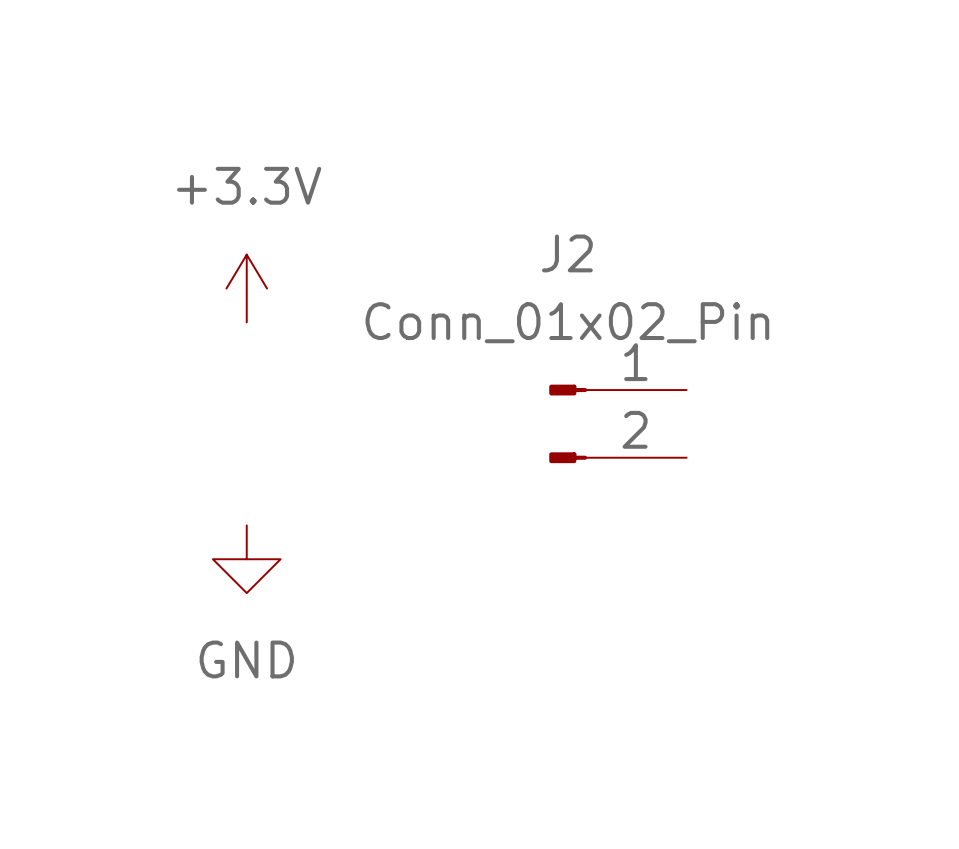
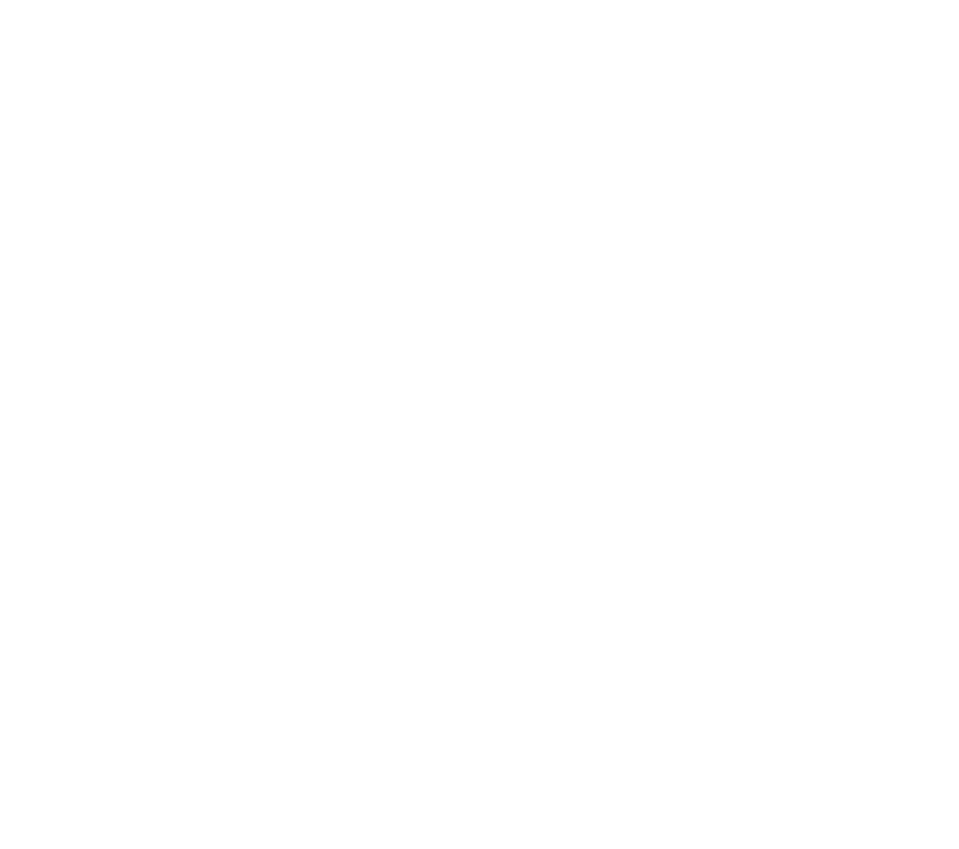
power symbol: +3.3V (246, 288) -> none
J2: Conn_01x02_Pin (617, 423) -> none
power symbol: GND (246, 559) -> none

